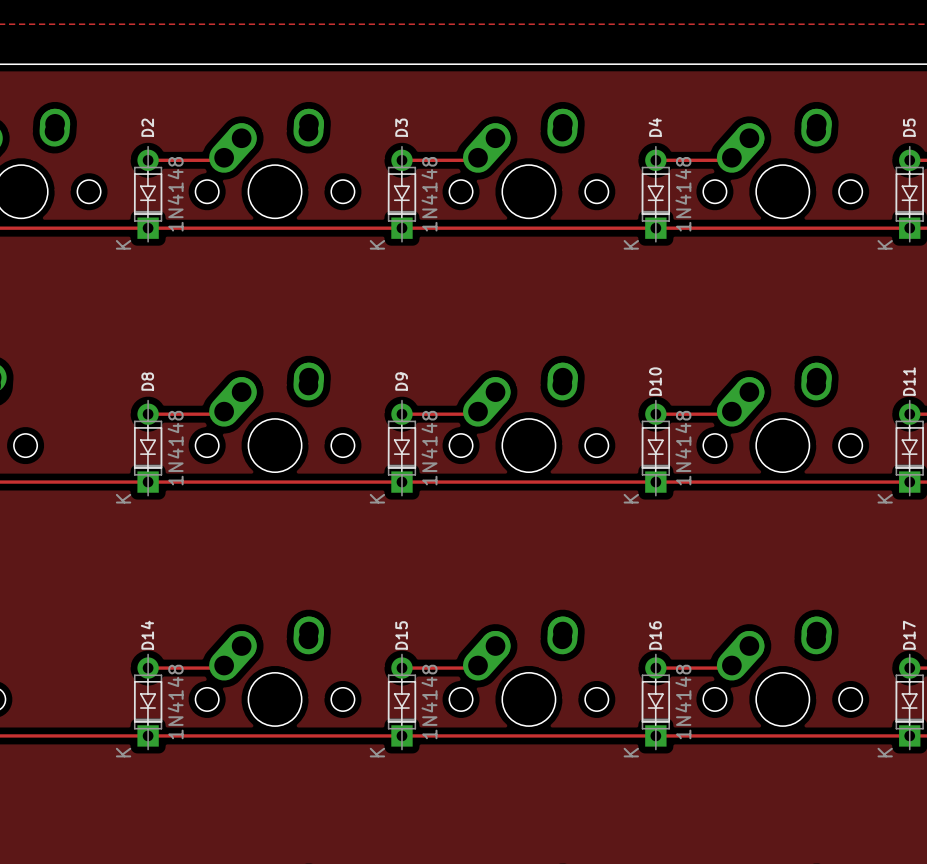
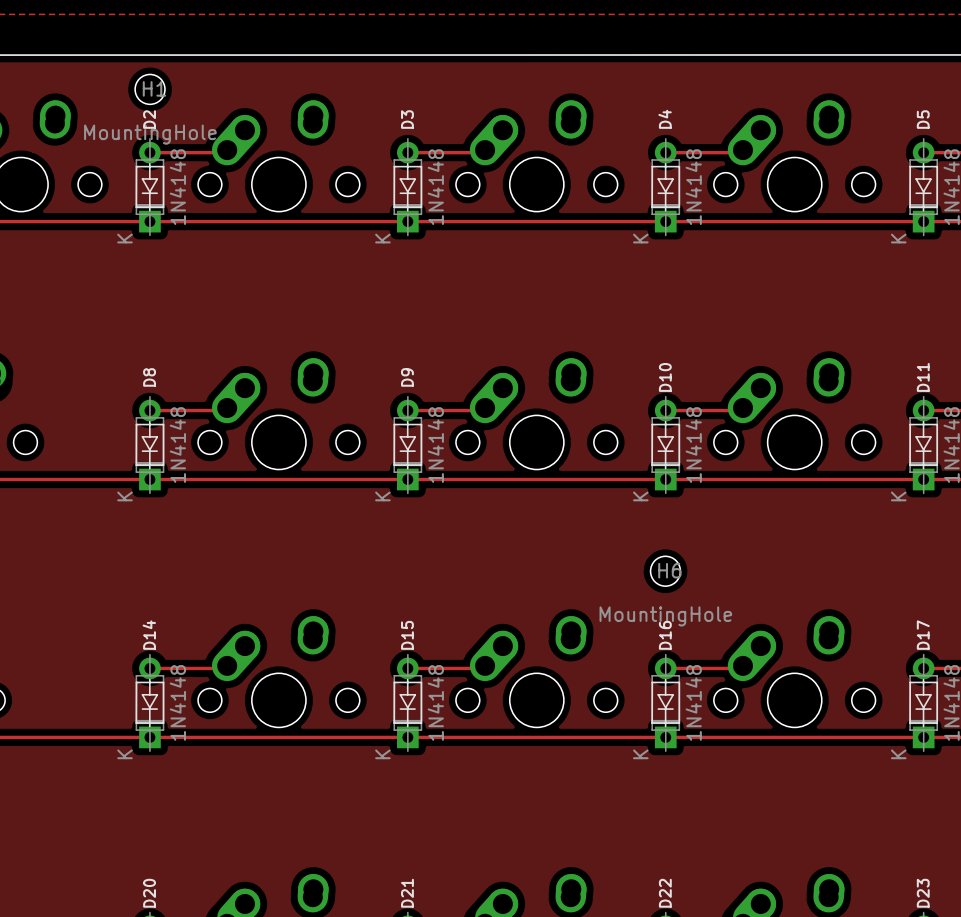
H1: none -> MountingHole (150, 89)
H6: none -> MountingHole (665, 571)

